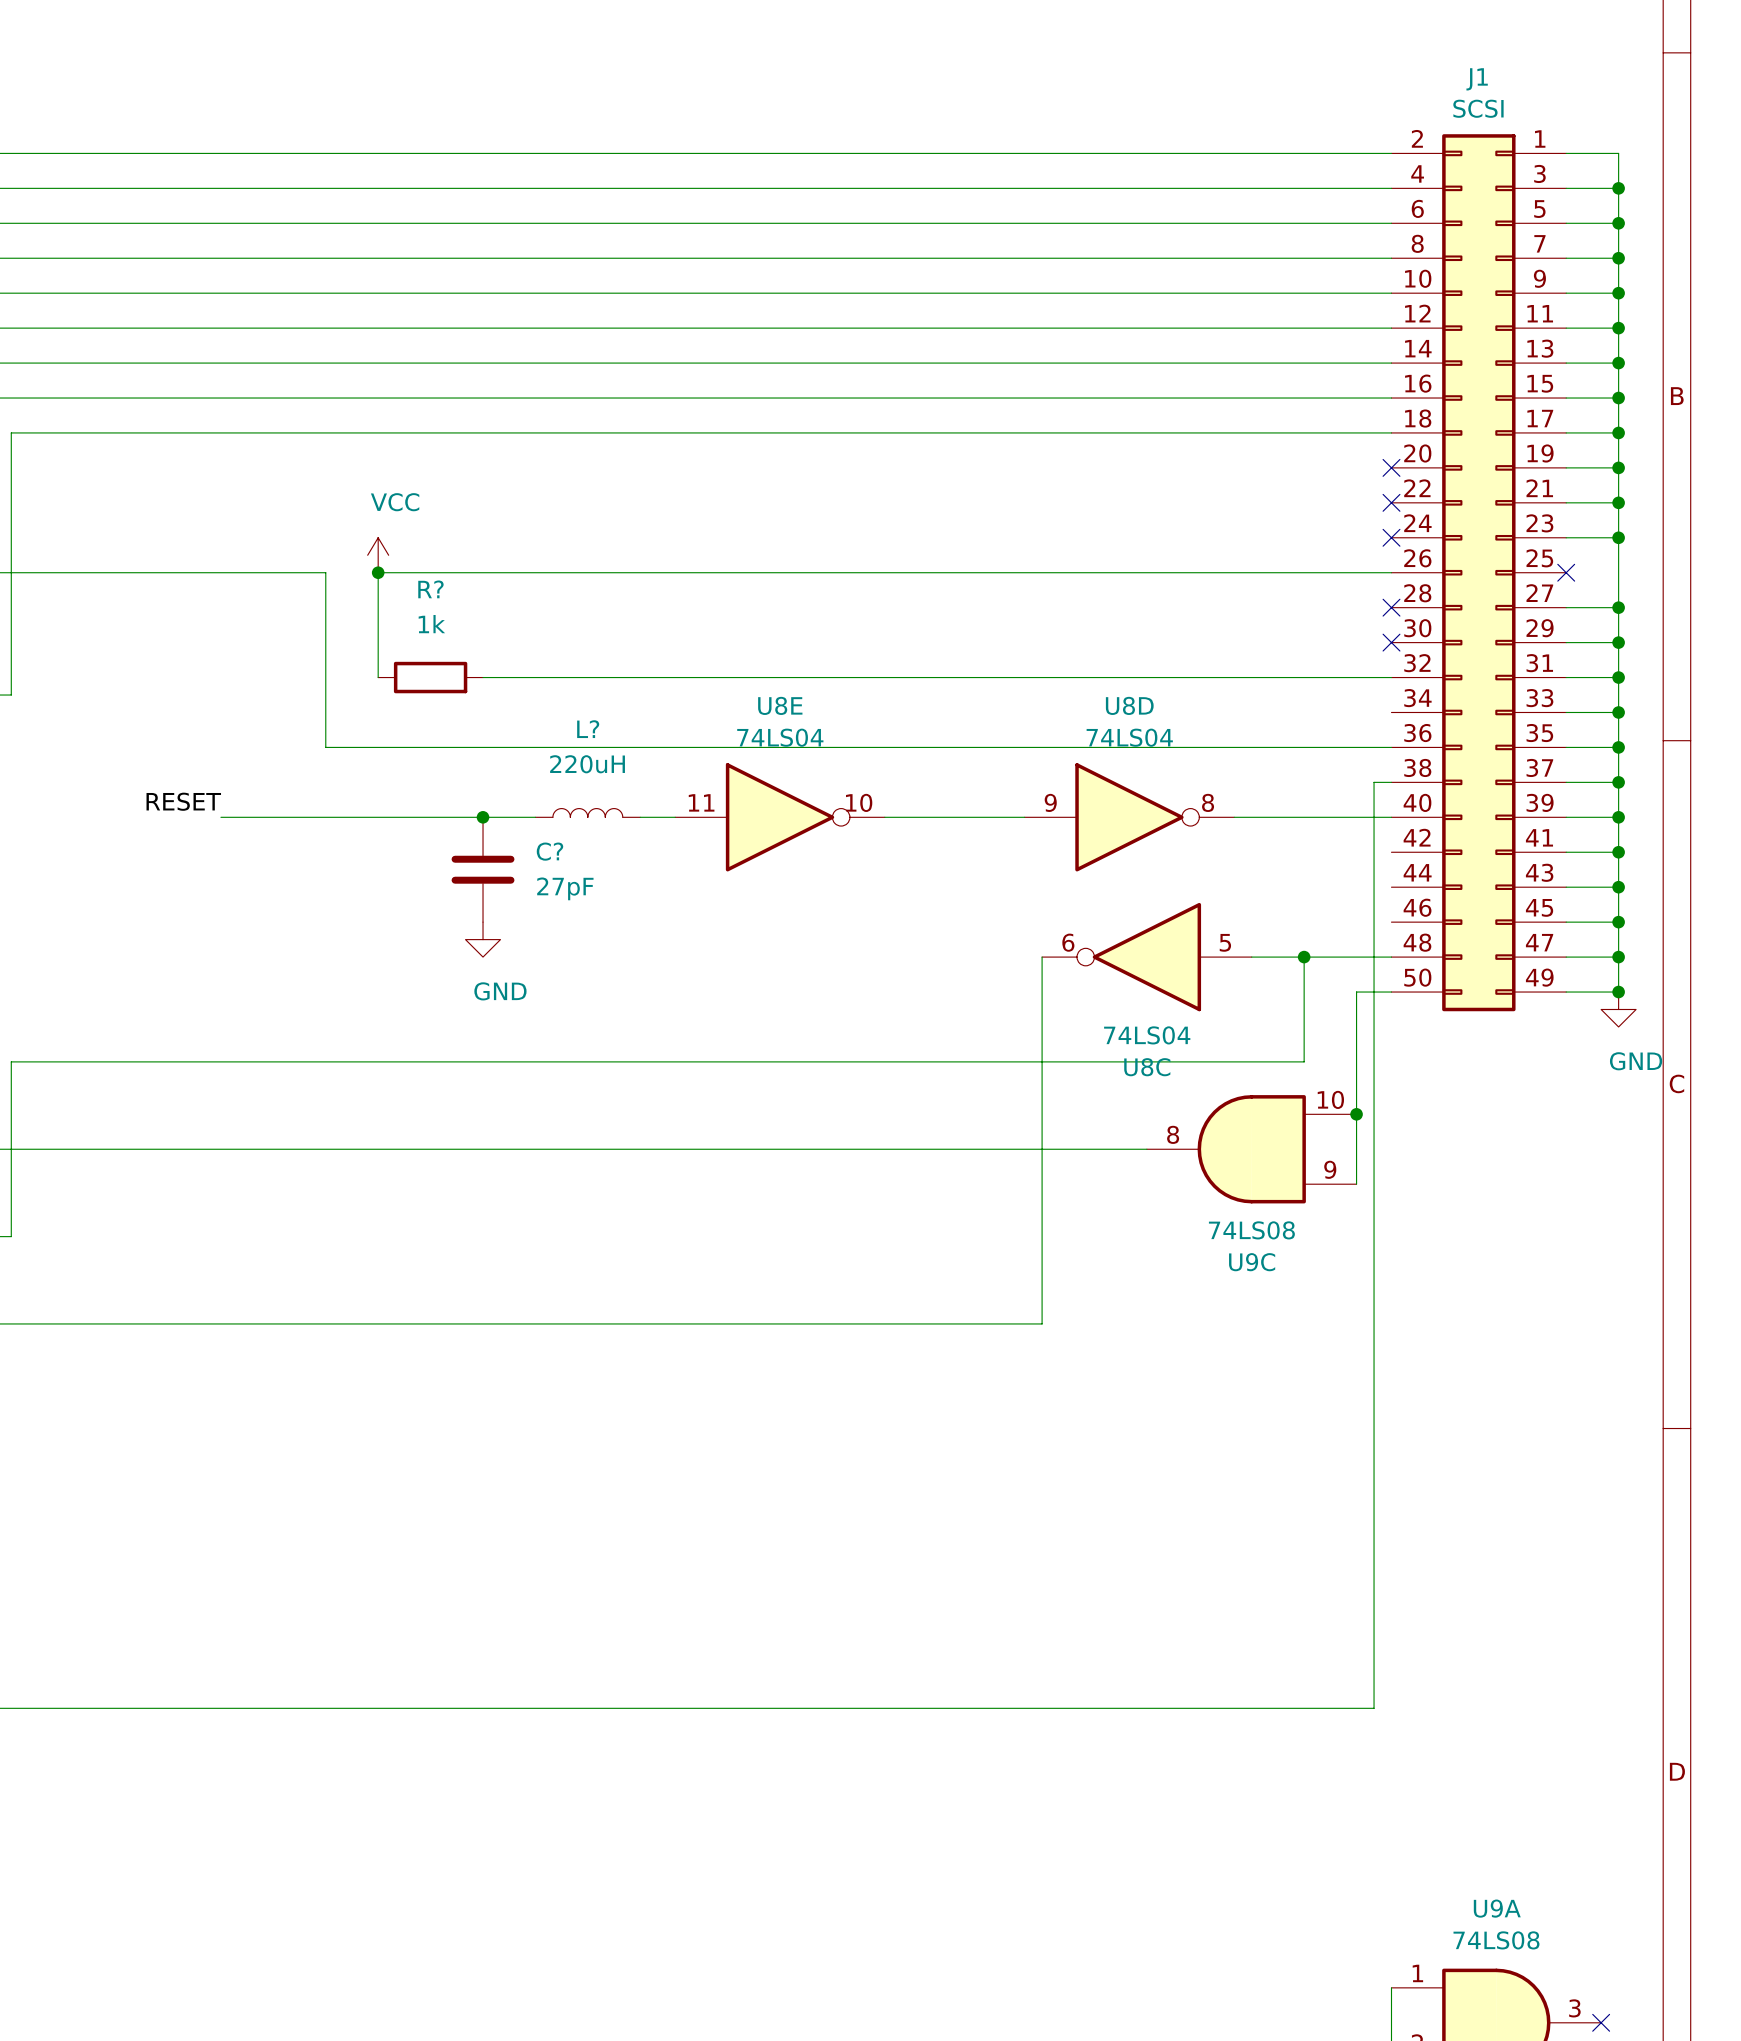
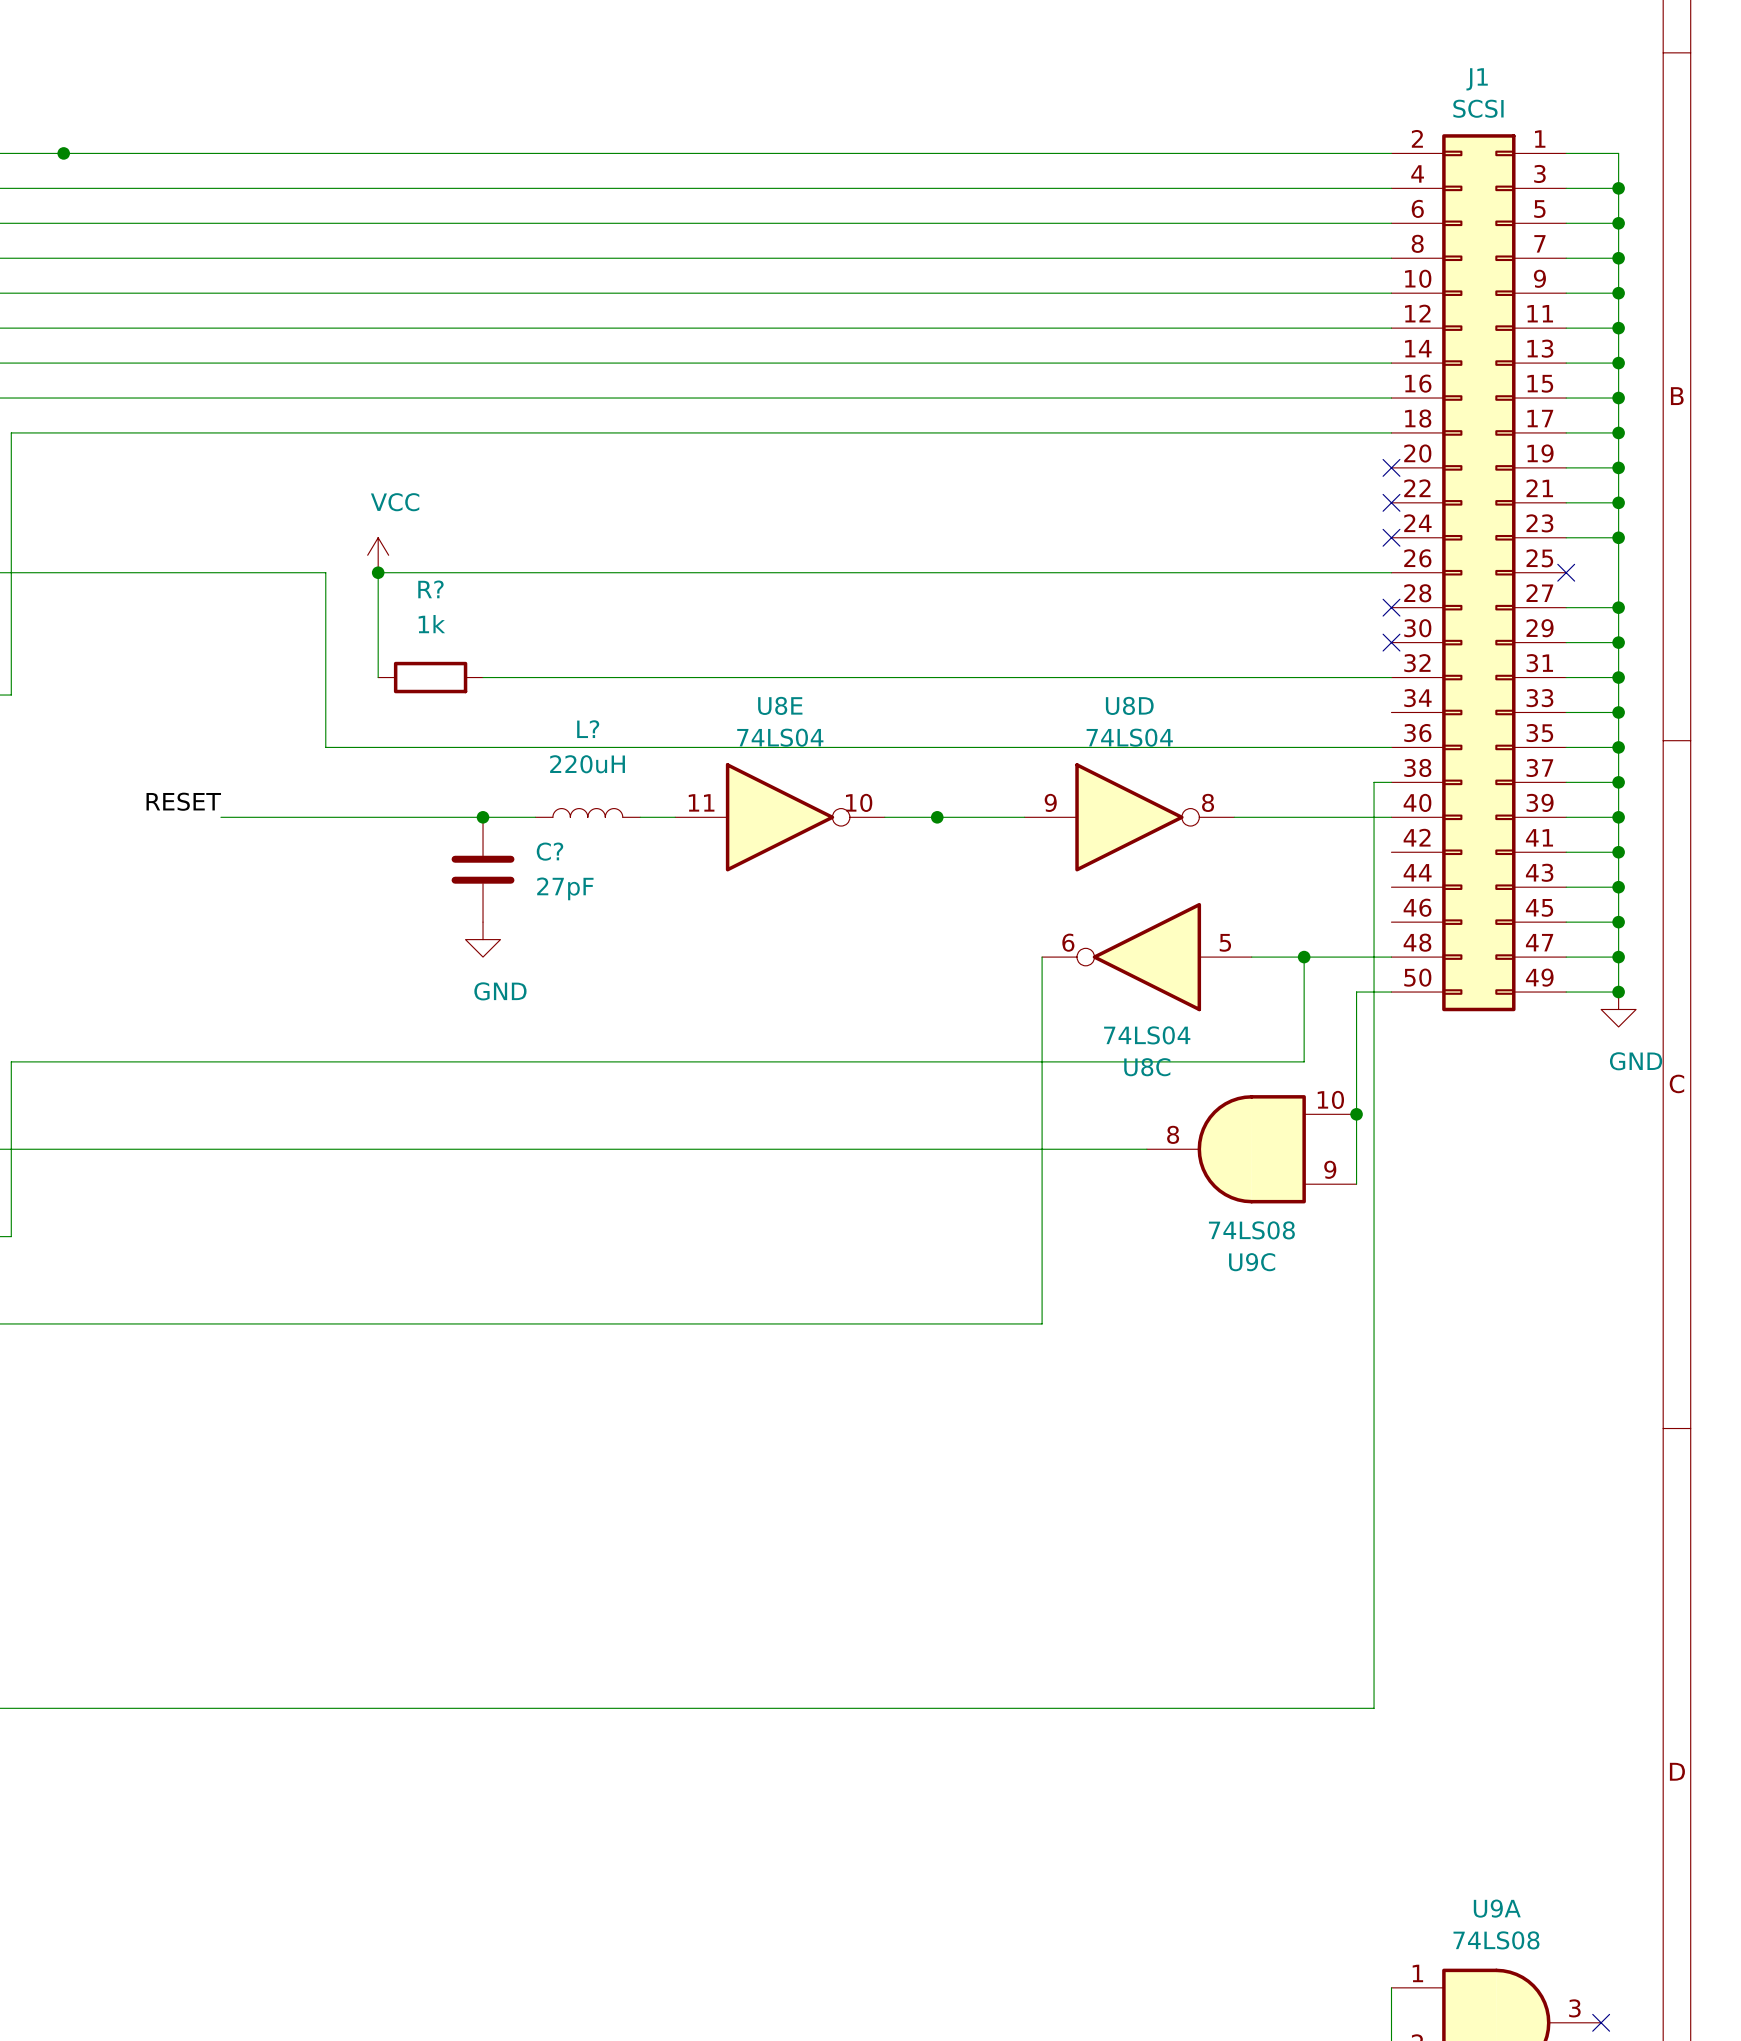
junction: none -> (63, 153)
junction: none -> (937, 817)

